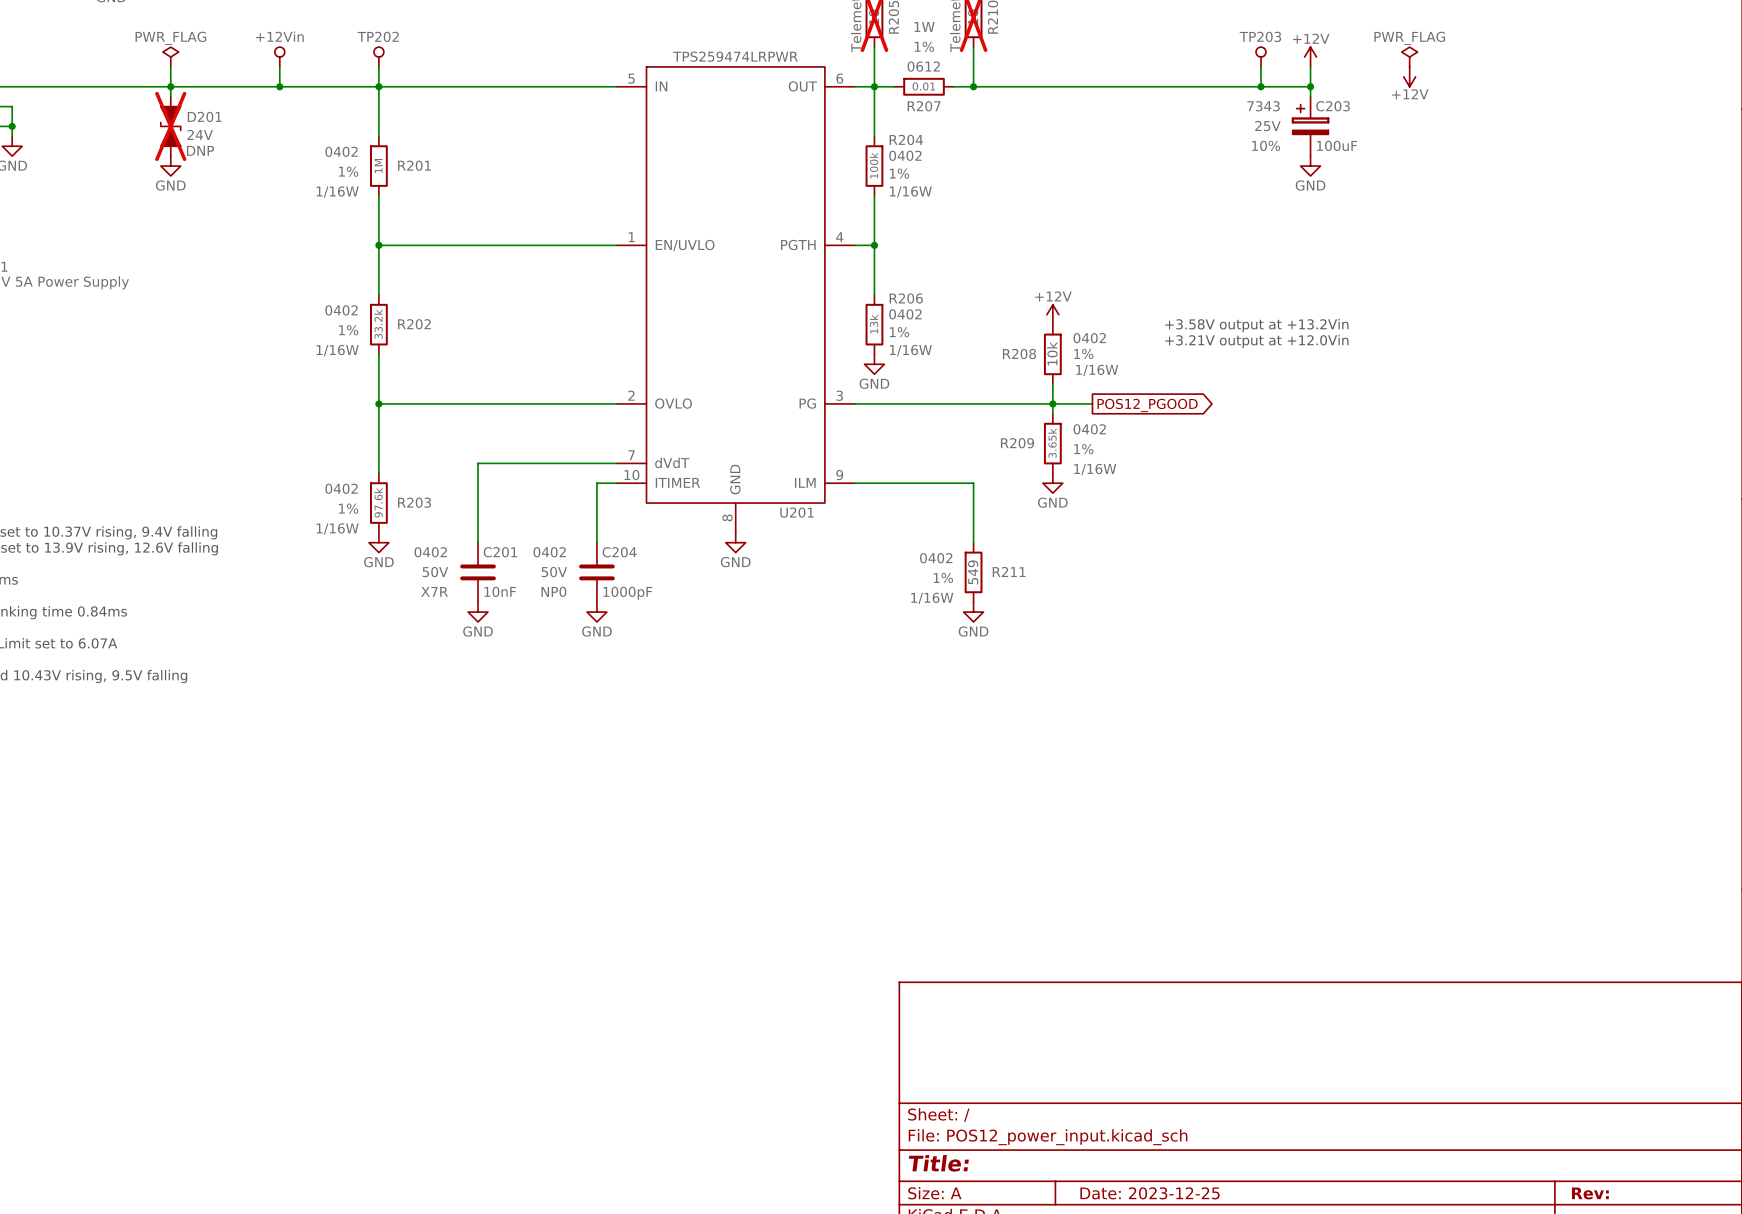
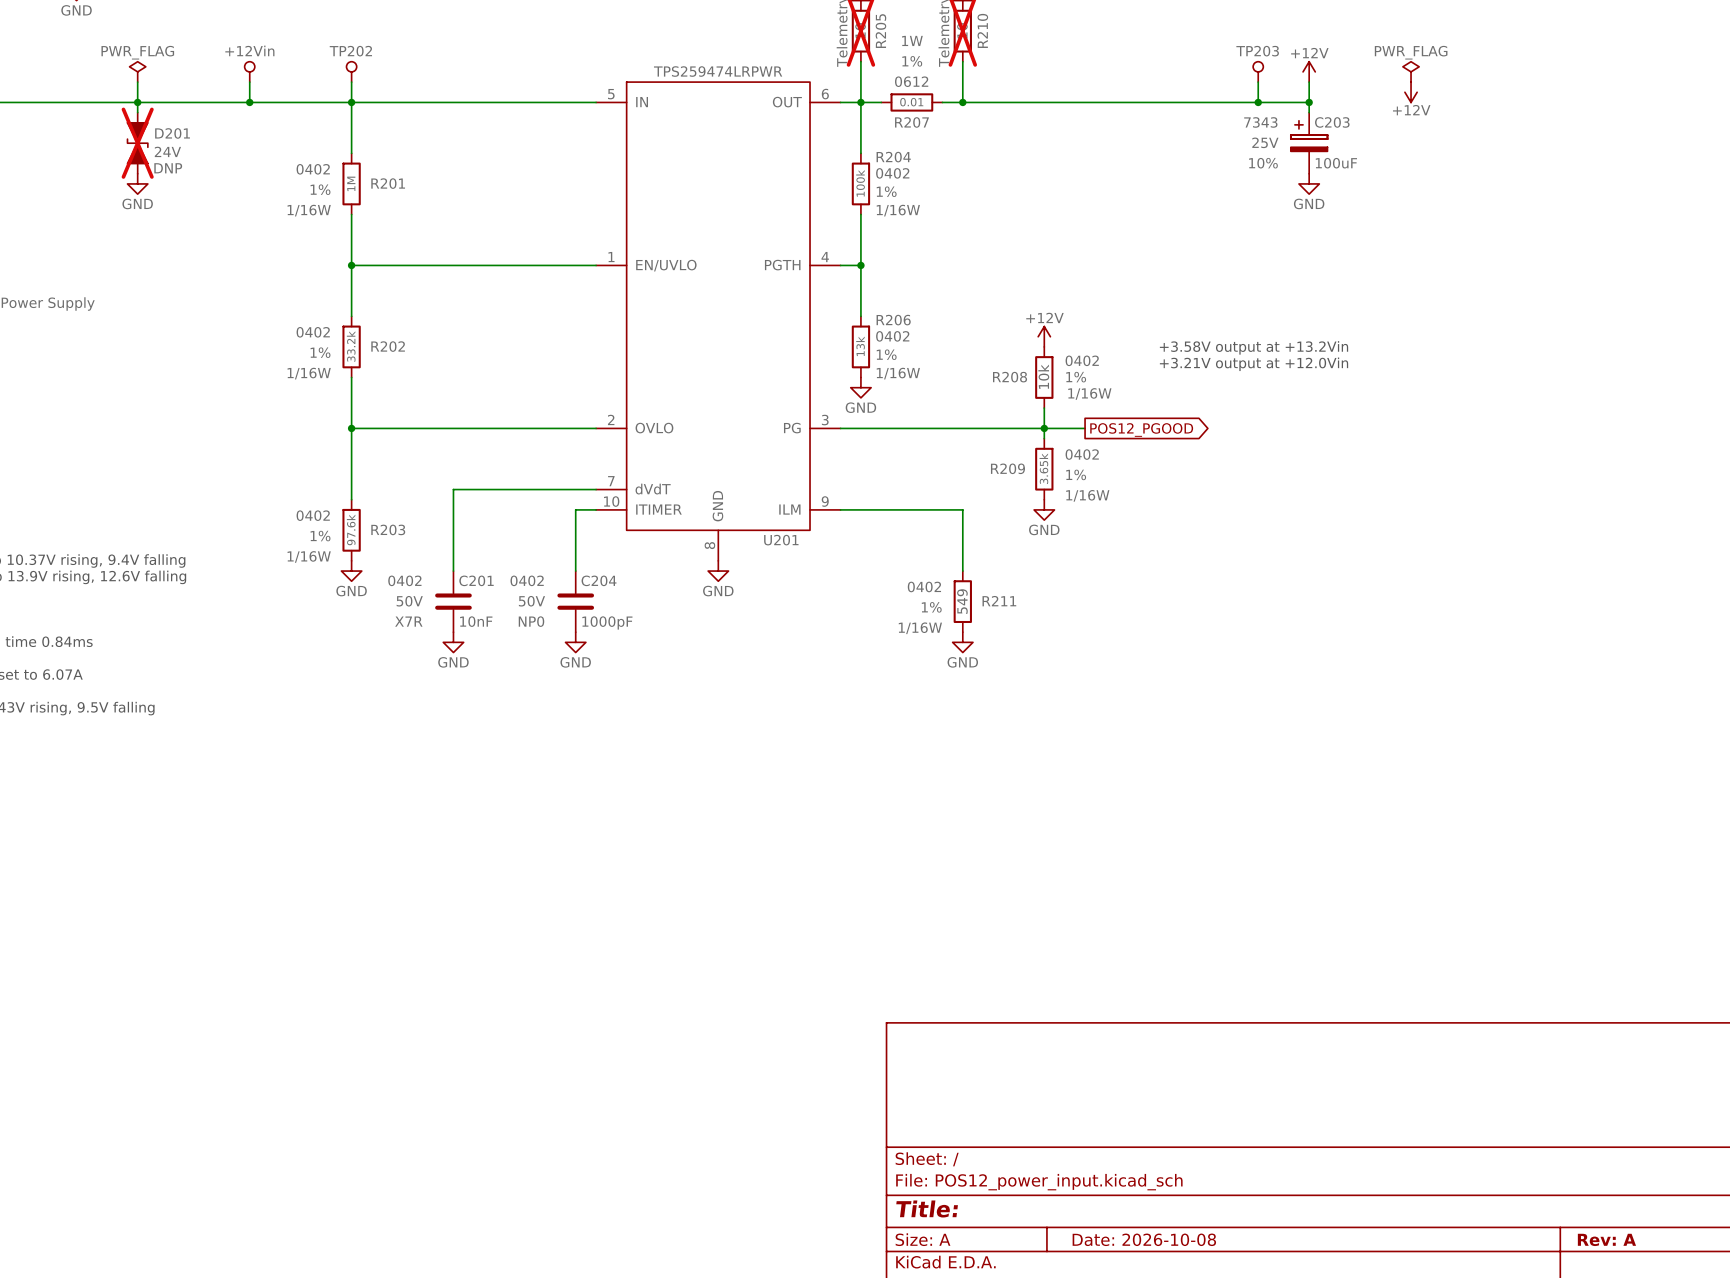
title block: Date: 2023-12-25 (1150, 1193) -> Date: 2026-10-08 (1144, 1239)
title block: Rev: (1590, 1193) -> Rev: A (1606, 1239)

